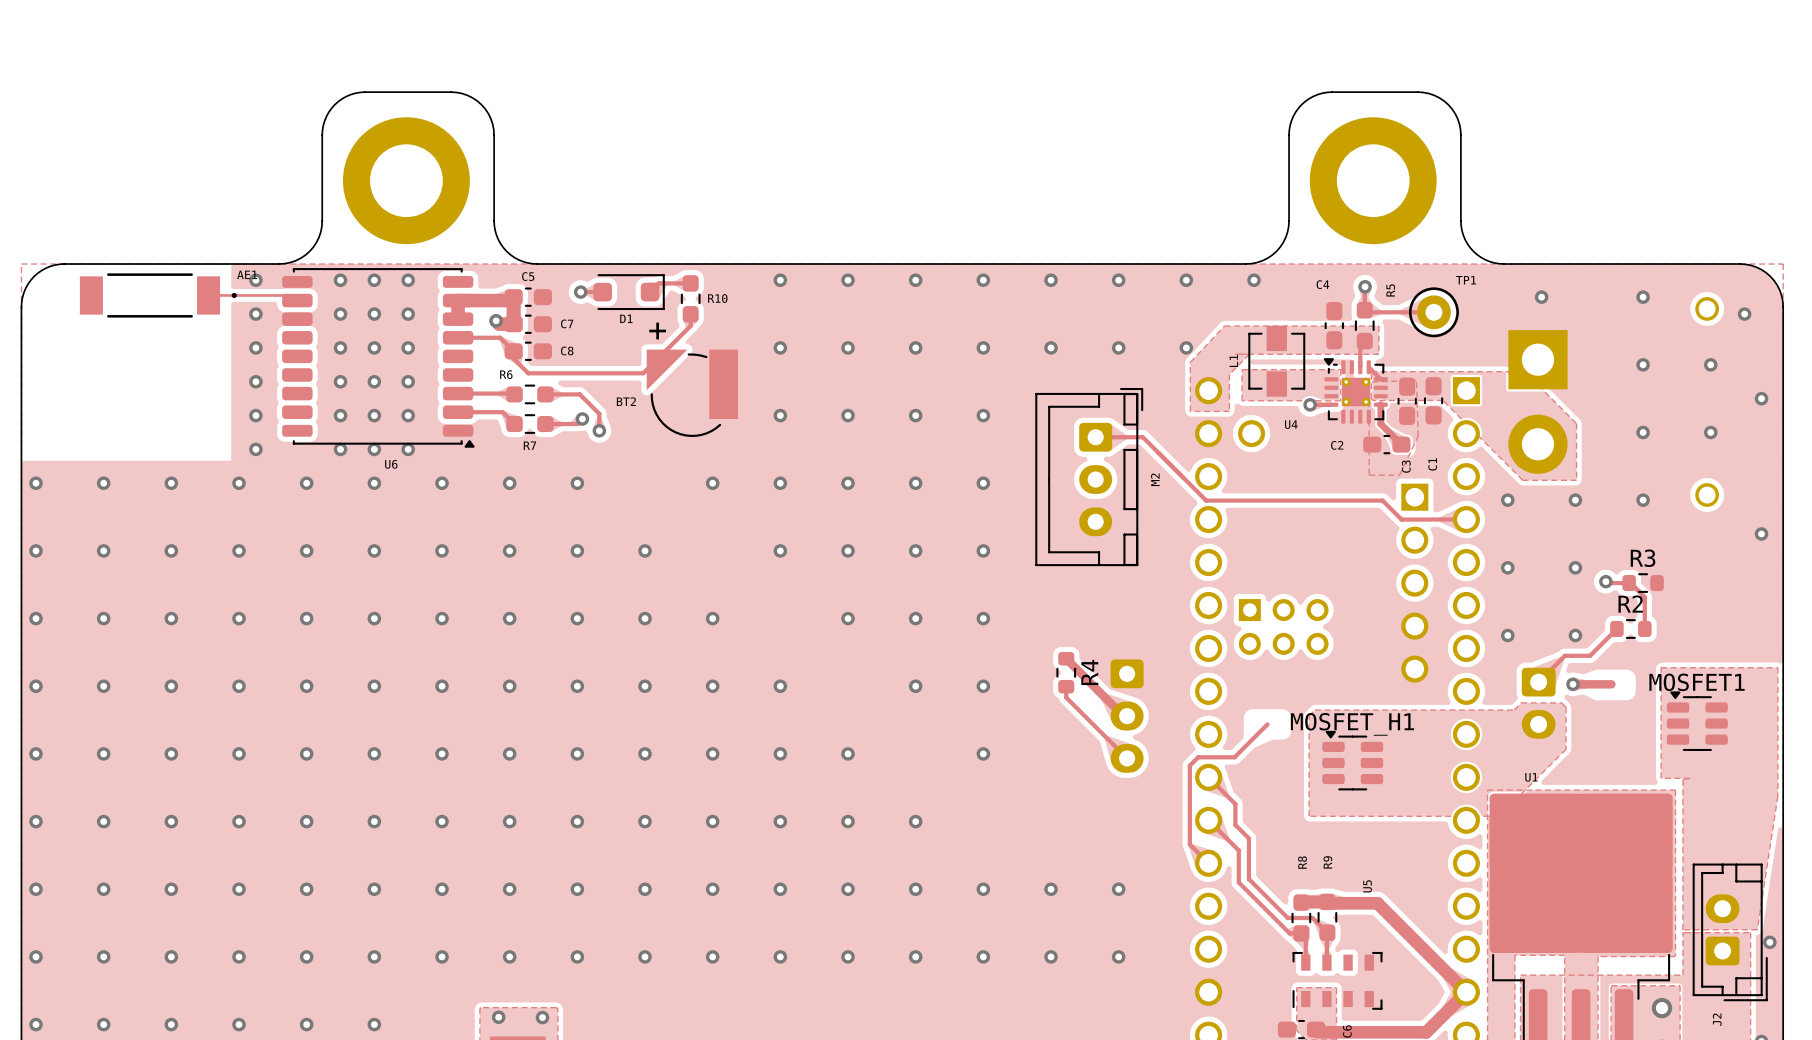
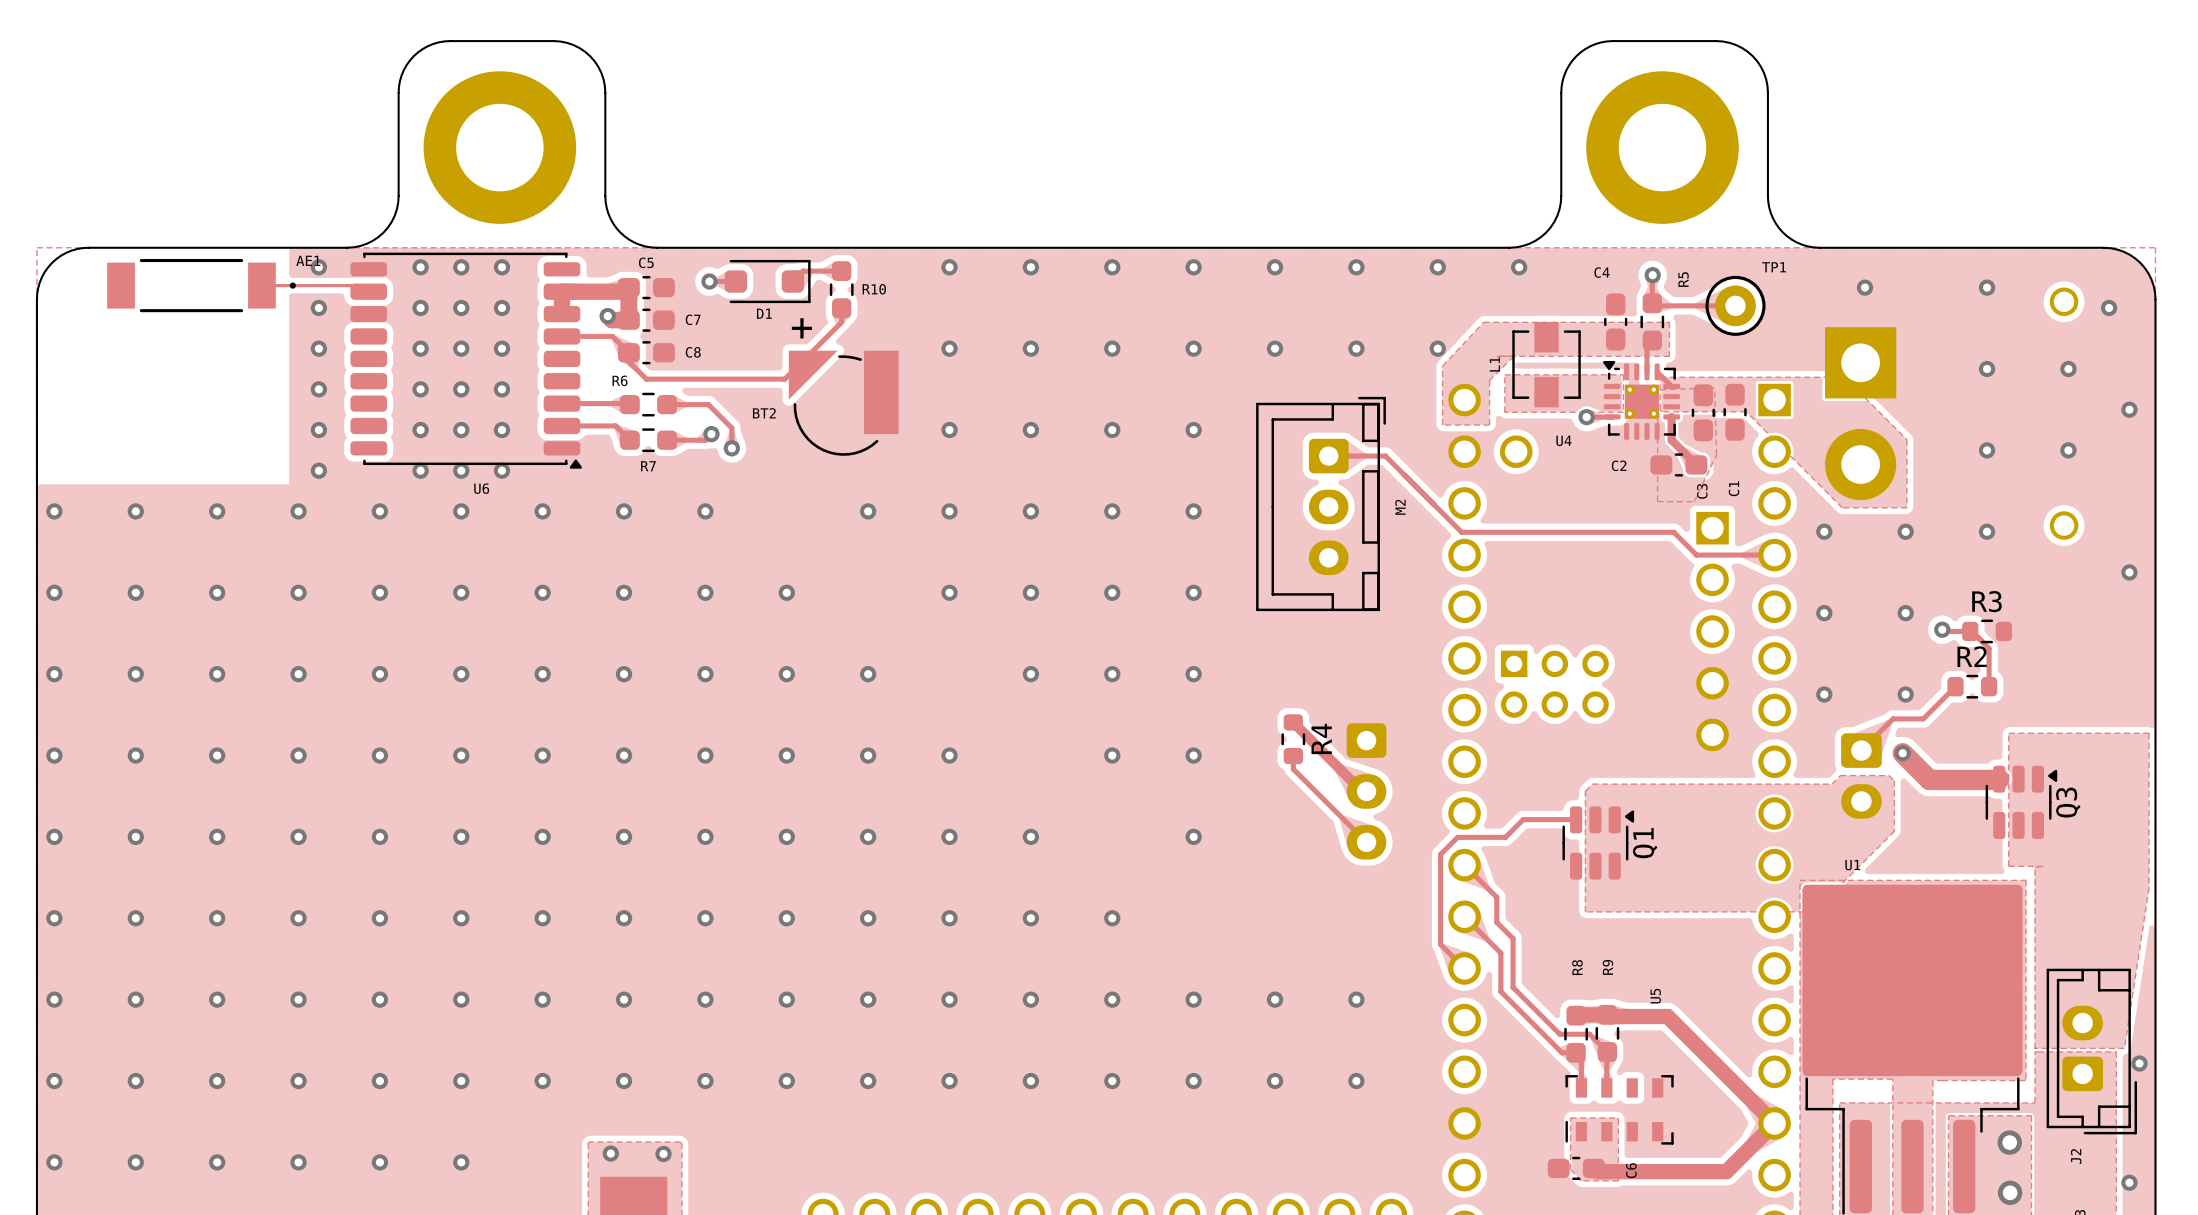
track: (1573, 684) (1612, 685) -> (1902, 753) (1929, 779) (1999, 779)
MOSFET1: (1697, 721) -> none
track: (1267, 724) (1234, 757) (1198, 757) (1189, 765) (1189, 844) -> (1575, 819) (1523, 819) (1505, 837) (1457, 837) (1440, 854) (1441, 945)
Q3: none -> (2021, 802)
Q1: none -> (1598, 843)
MOSFET_H1: (1352, 760) -> none

